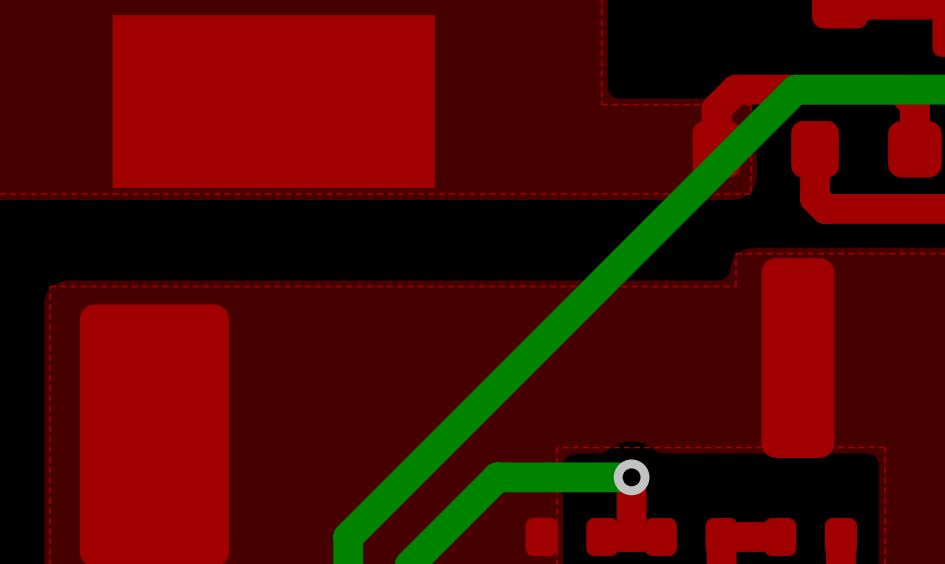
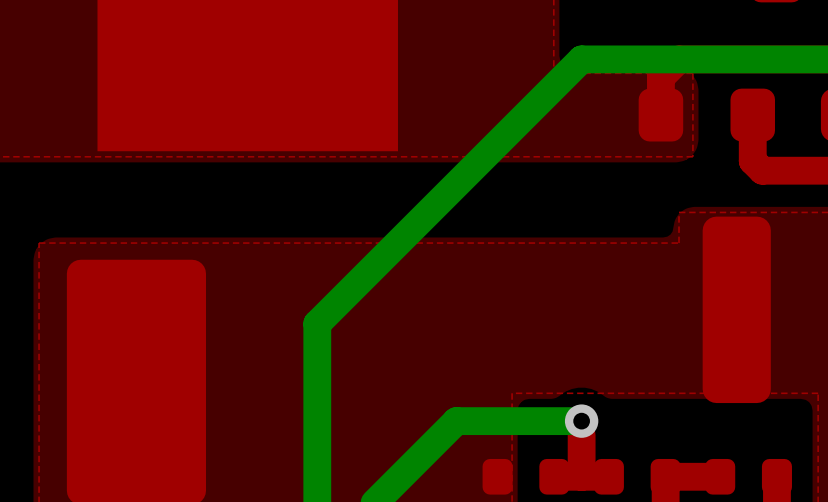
bottom track: (795, 89) (348, 537) -> (734, 59) (581, 59) (317, 323) (317, 476)

